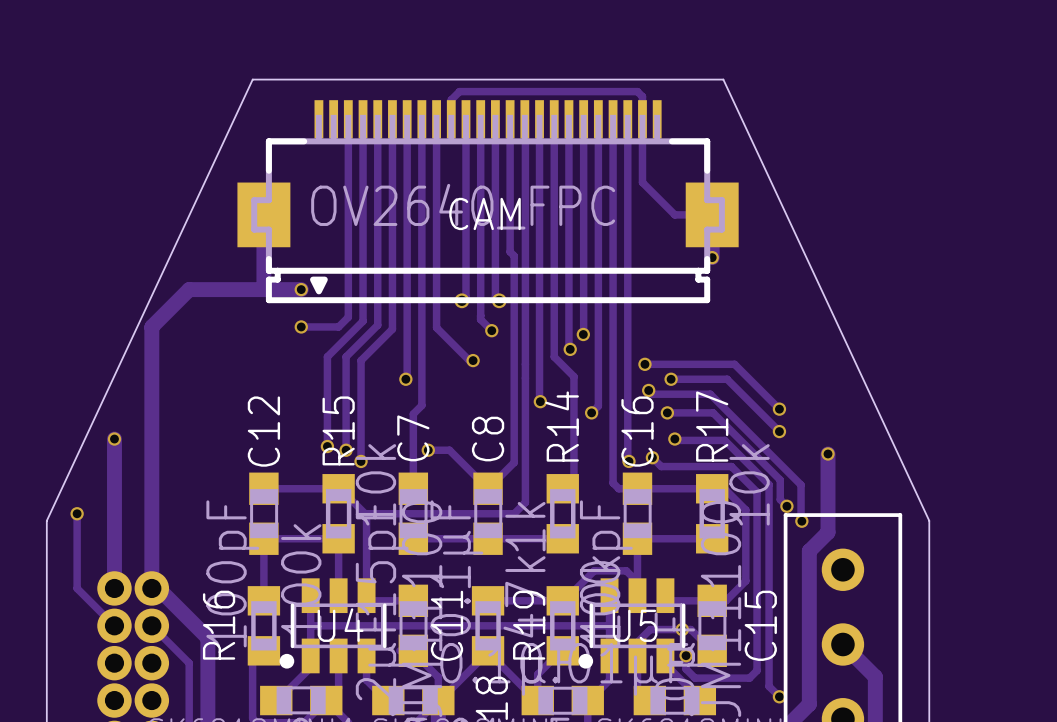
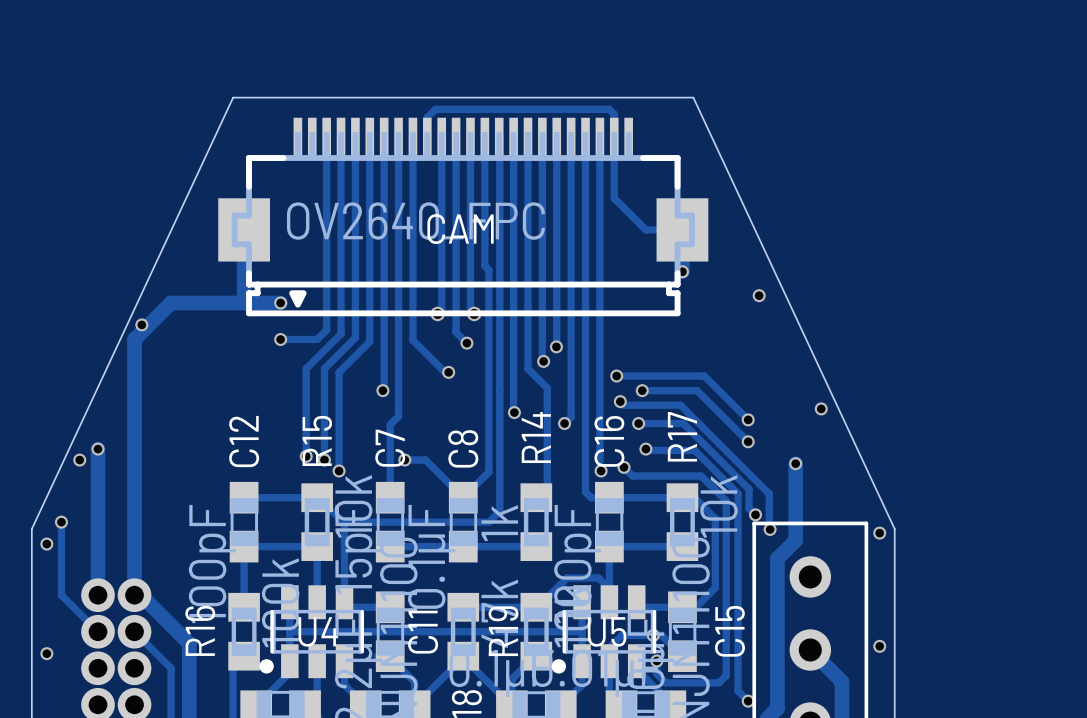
via: none -> (759, 295)
via: none -> (141, 324)
via: none -> (821, 408)
via: none -> (79, 460)
via: none -> (879, 533)
via: none -> (46, 544)
via: none -> (879, 646)
via: none -> (46, 653)

